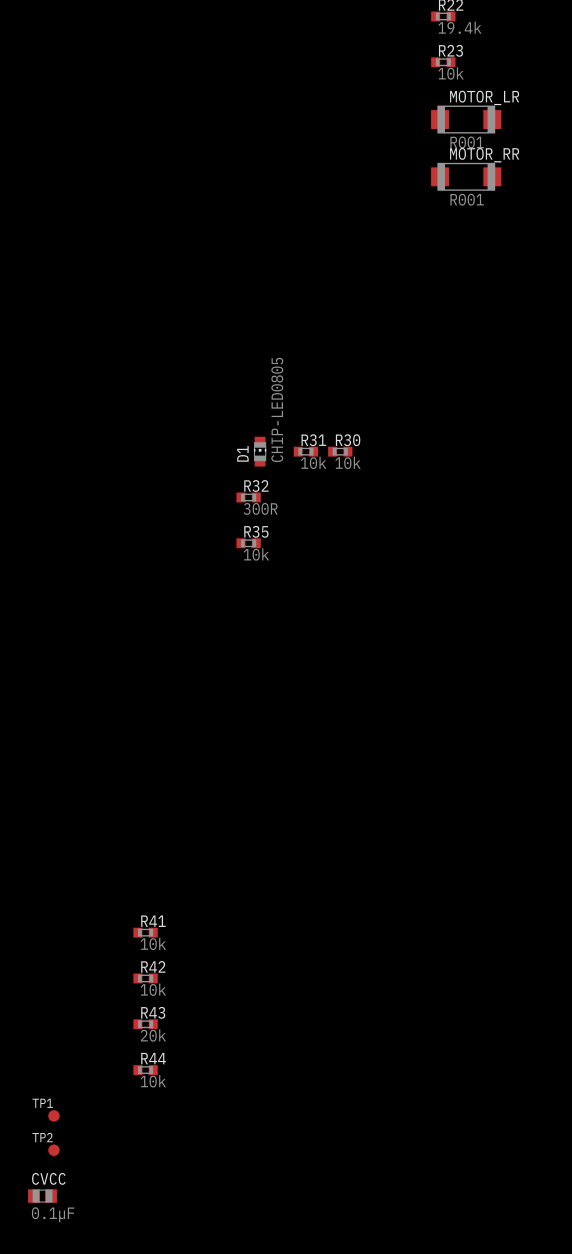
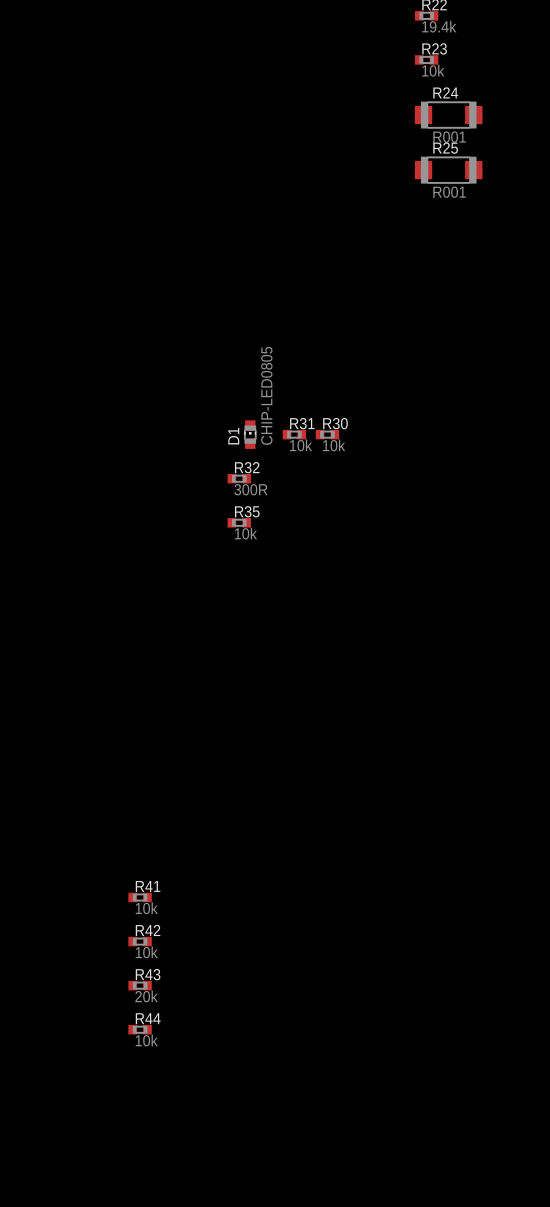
MOTOR_LR name: MOTOR_LR (484, 97) -> R24 (445, 92)
MOTOR_RR name: MOTOR_RR (484, 155) -> R25 (445, 148)
TP1: (53, 1115) -> none
TP2: (53, 1150) -> none
CVCC: 0.1µF (42, 1196) -> none

